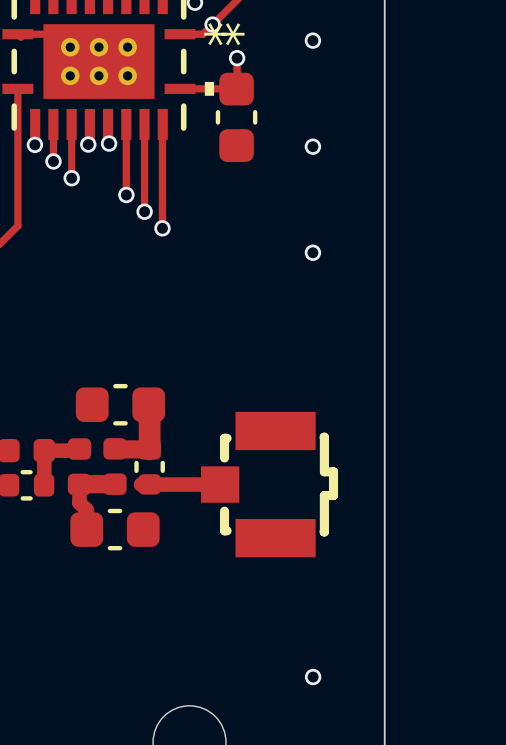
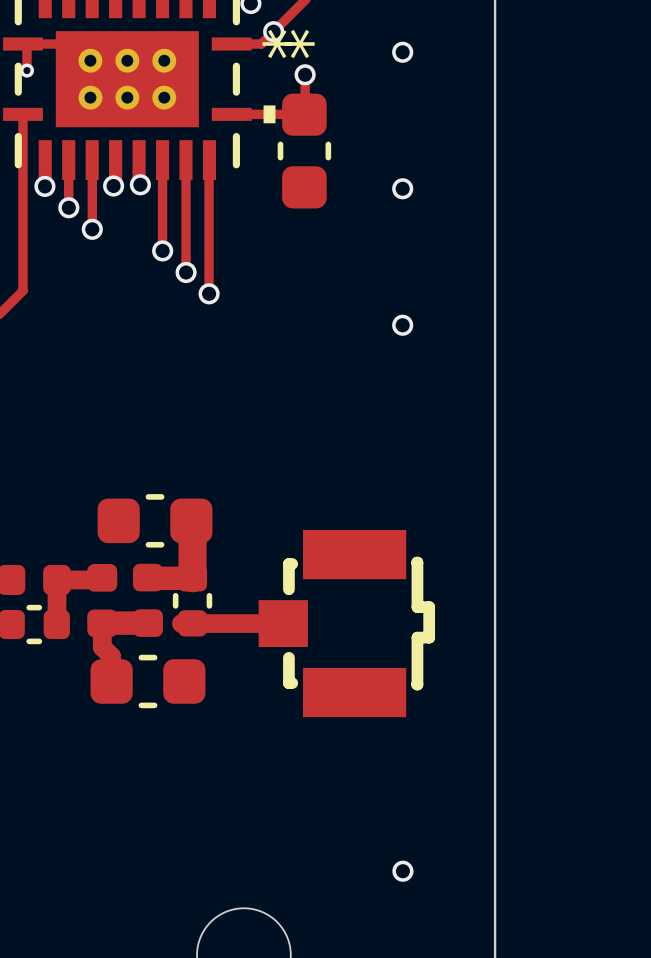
track: none -> (26, 47) (26, 70)
via: none -> (26, 70)

